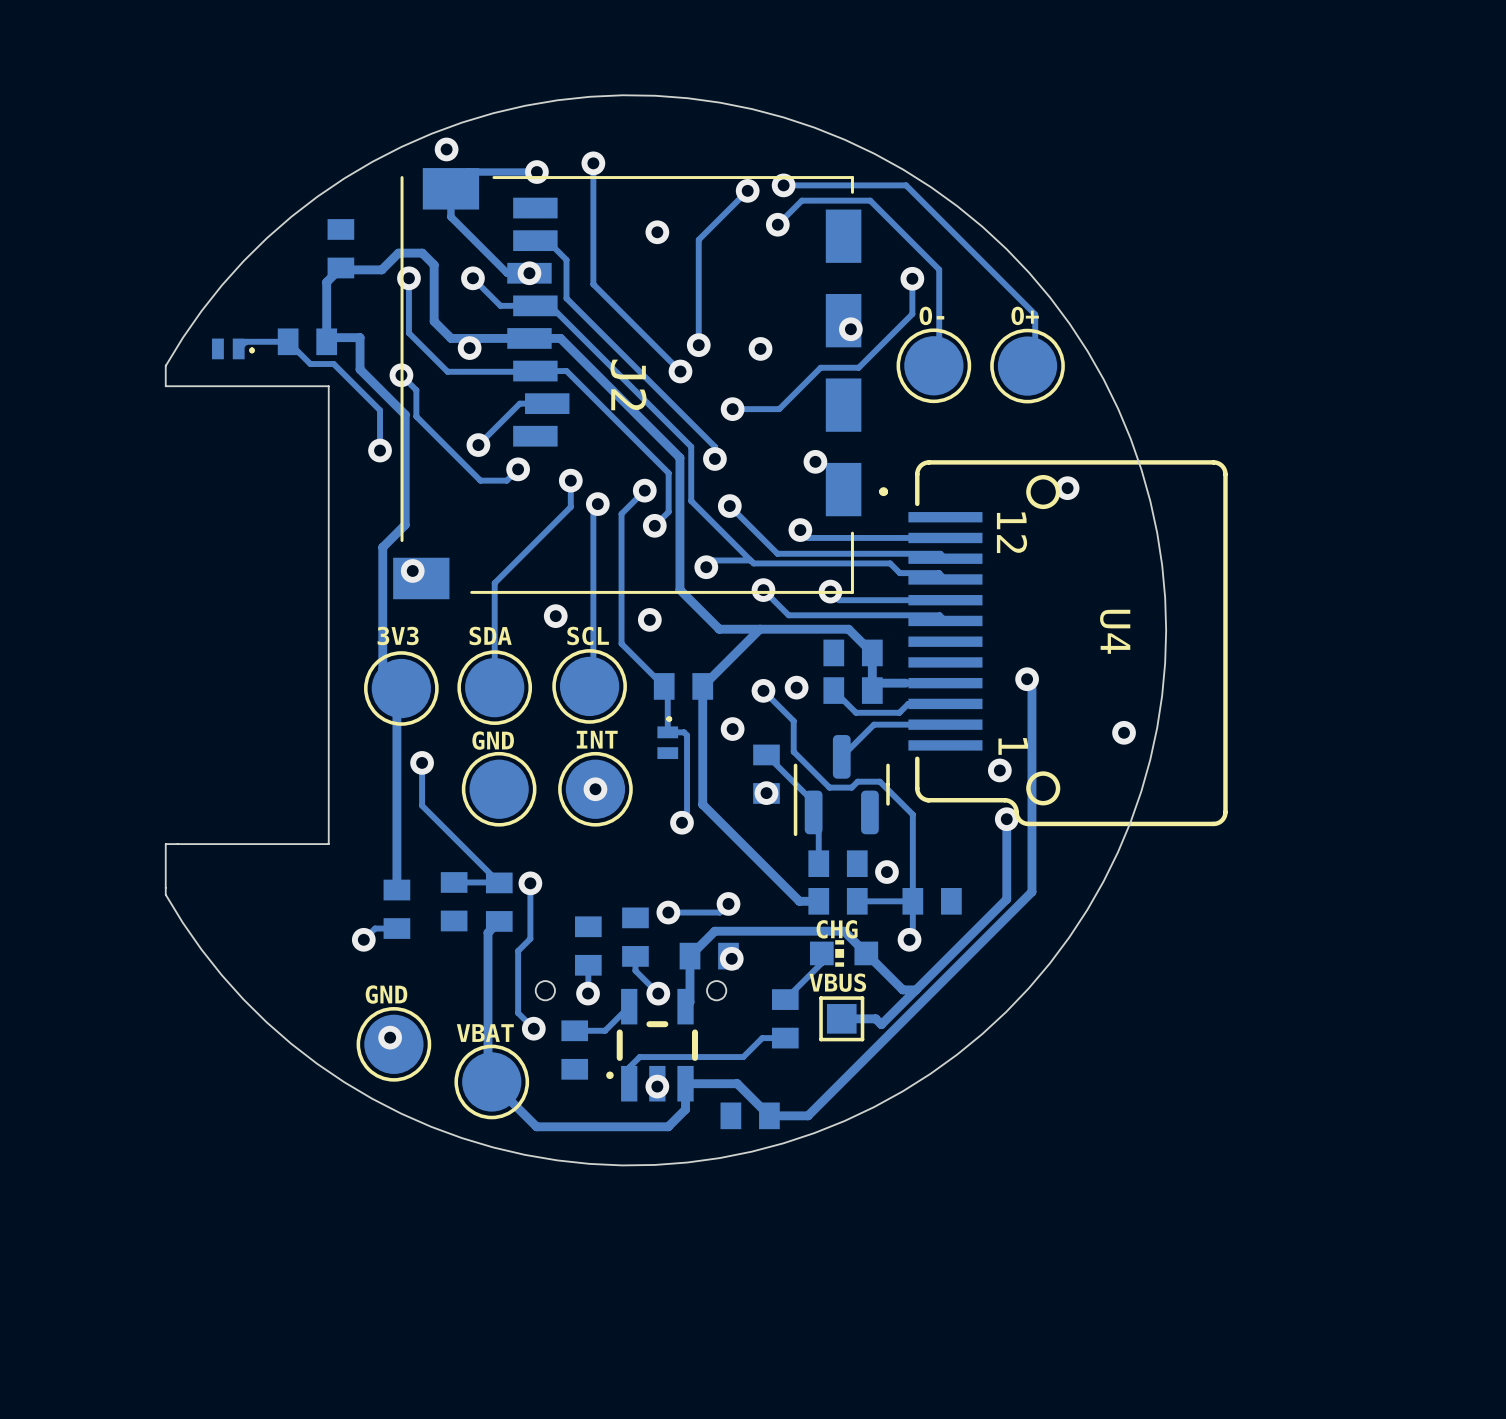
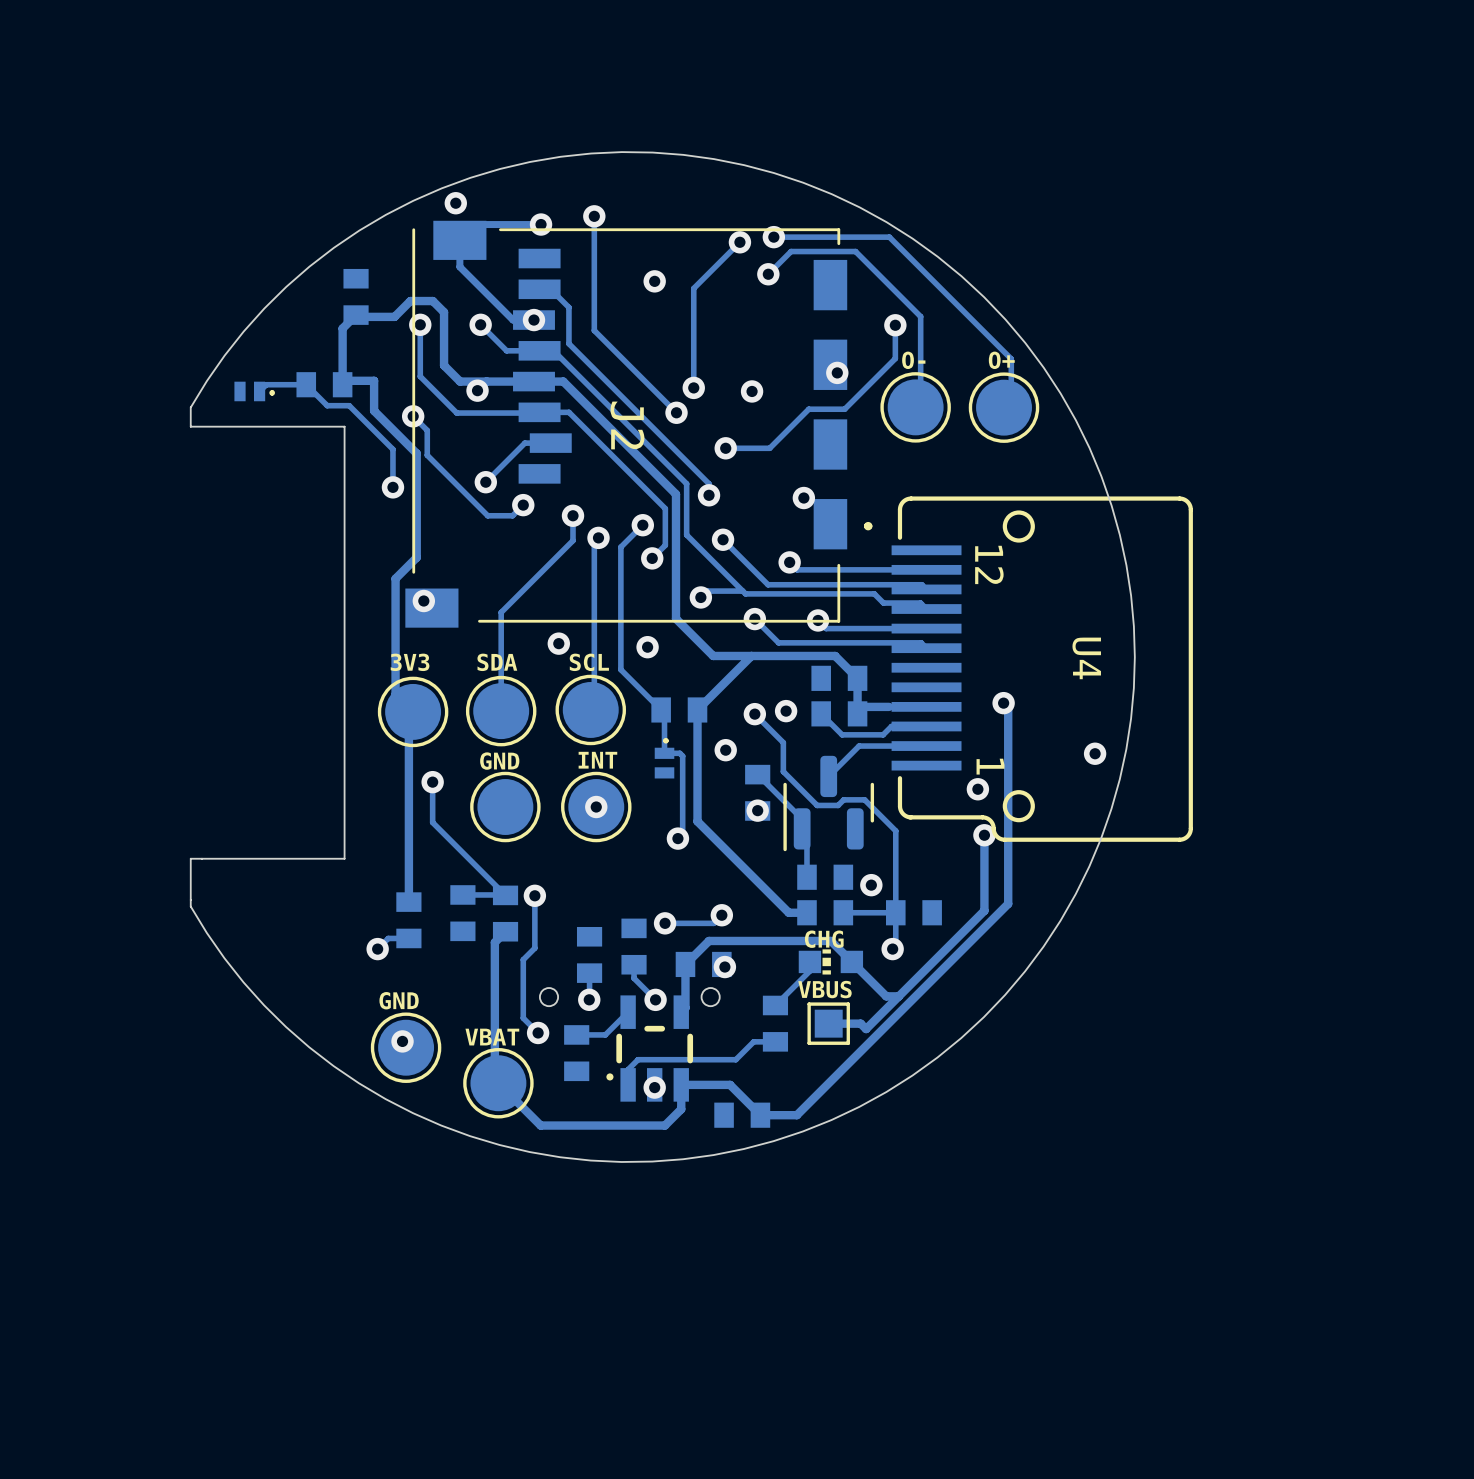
via: (1067, 488) -> none

